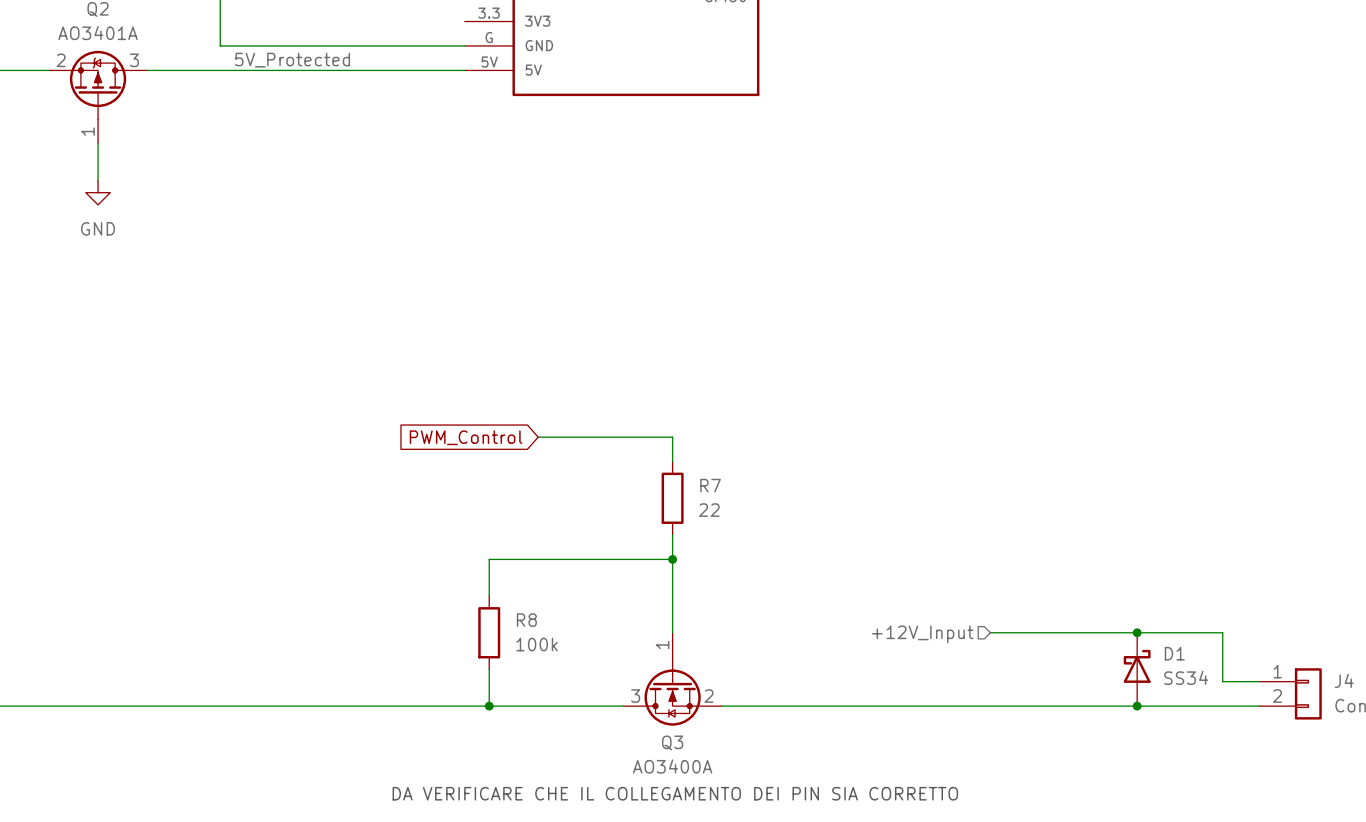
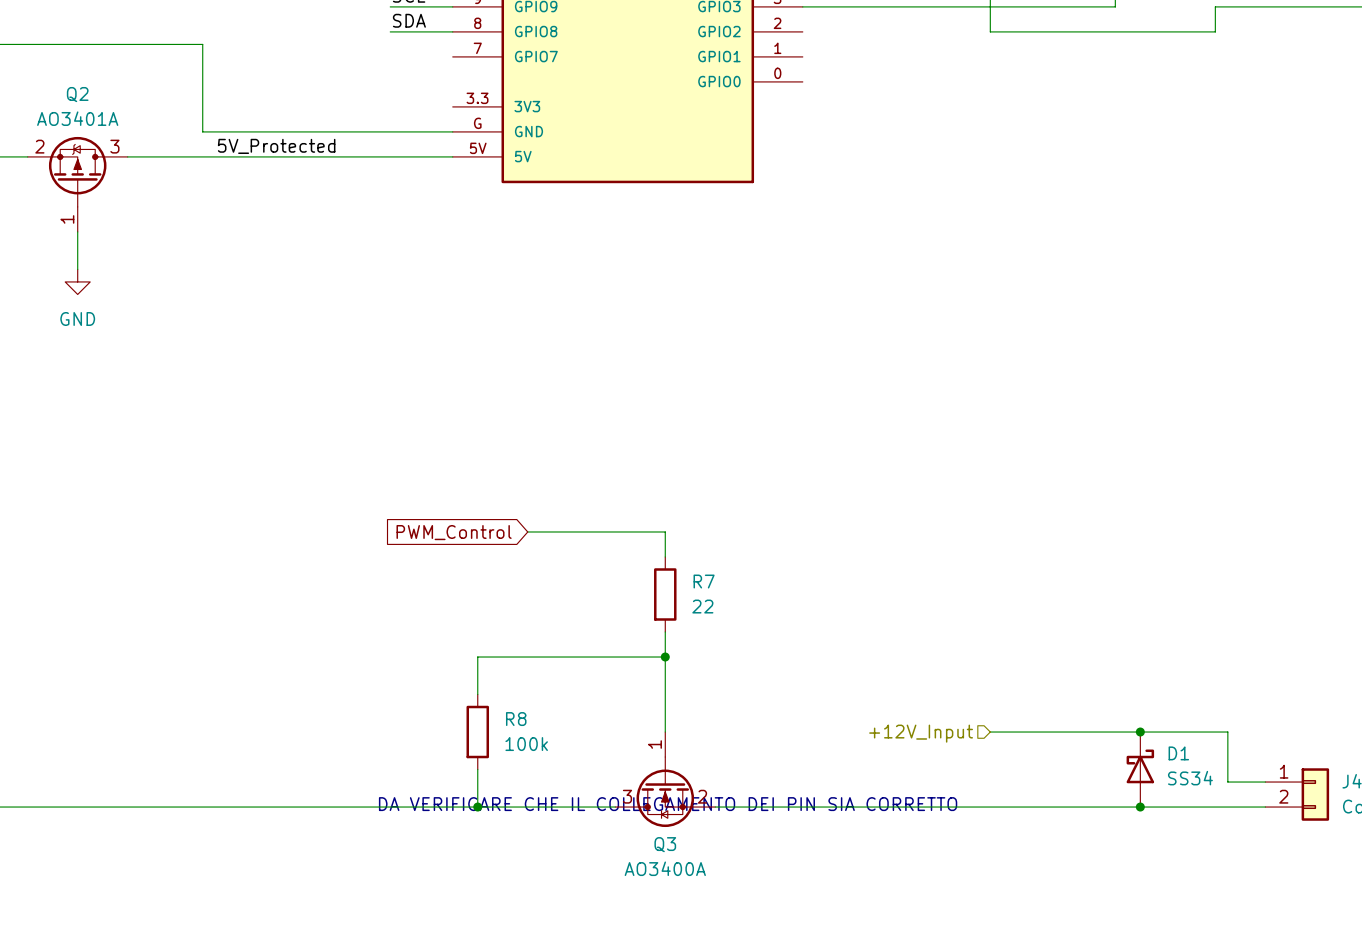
text position: DA VERIFICARE CHE IL COLLEGAMENTO DEI PIN SIA CORRETTO (675, 793) -> DA VERIFICARE CHE IL COLLEGAMENTO DEI PIN SIA CORRETTO (668, 804)

